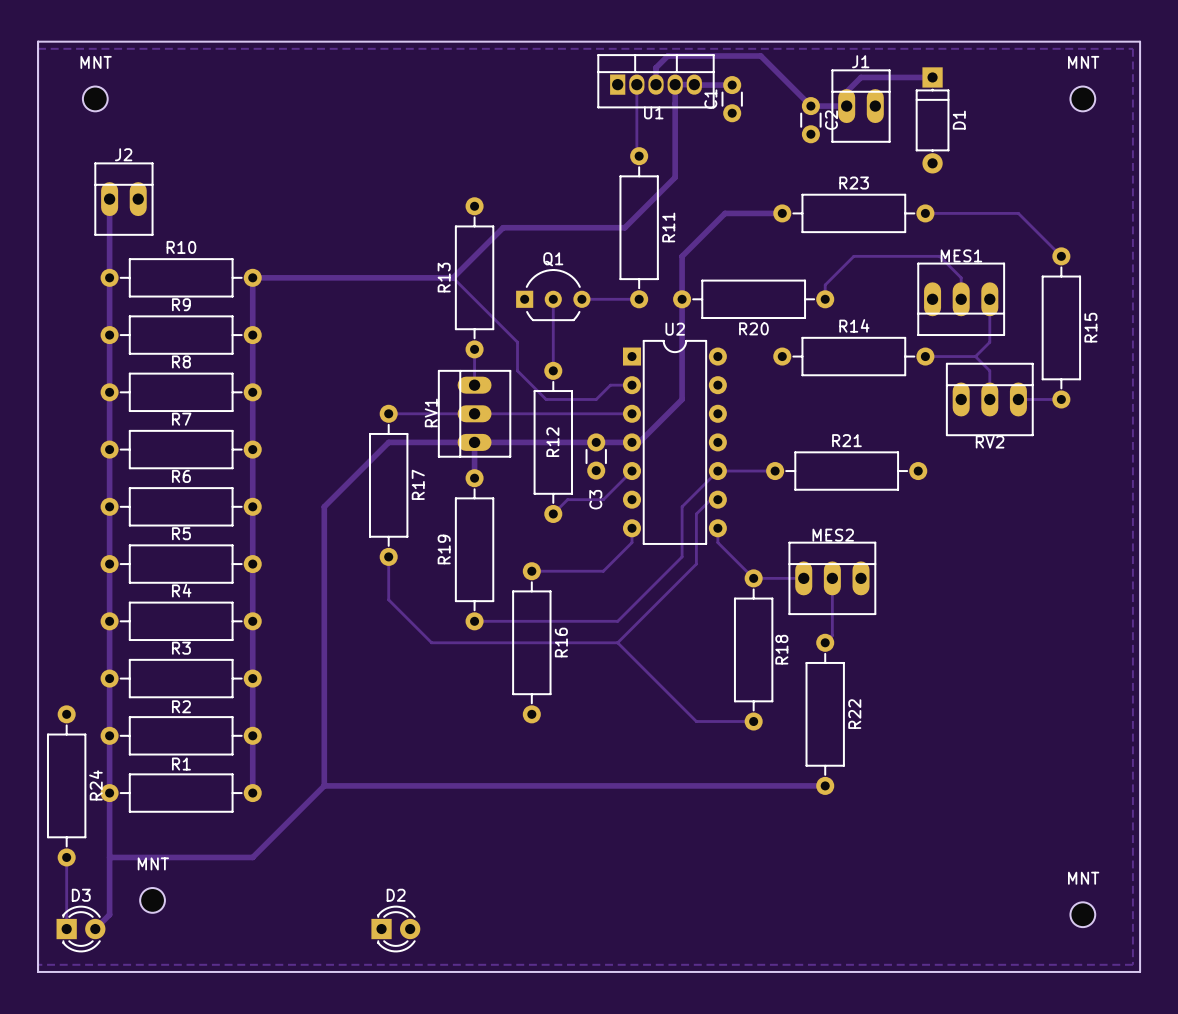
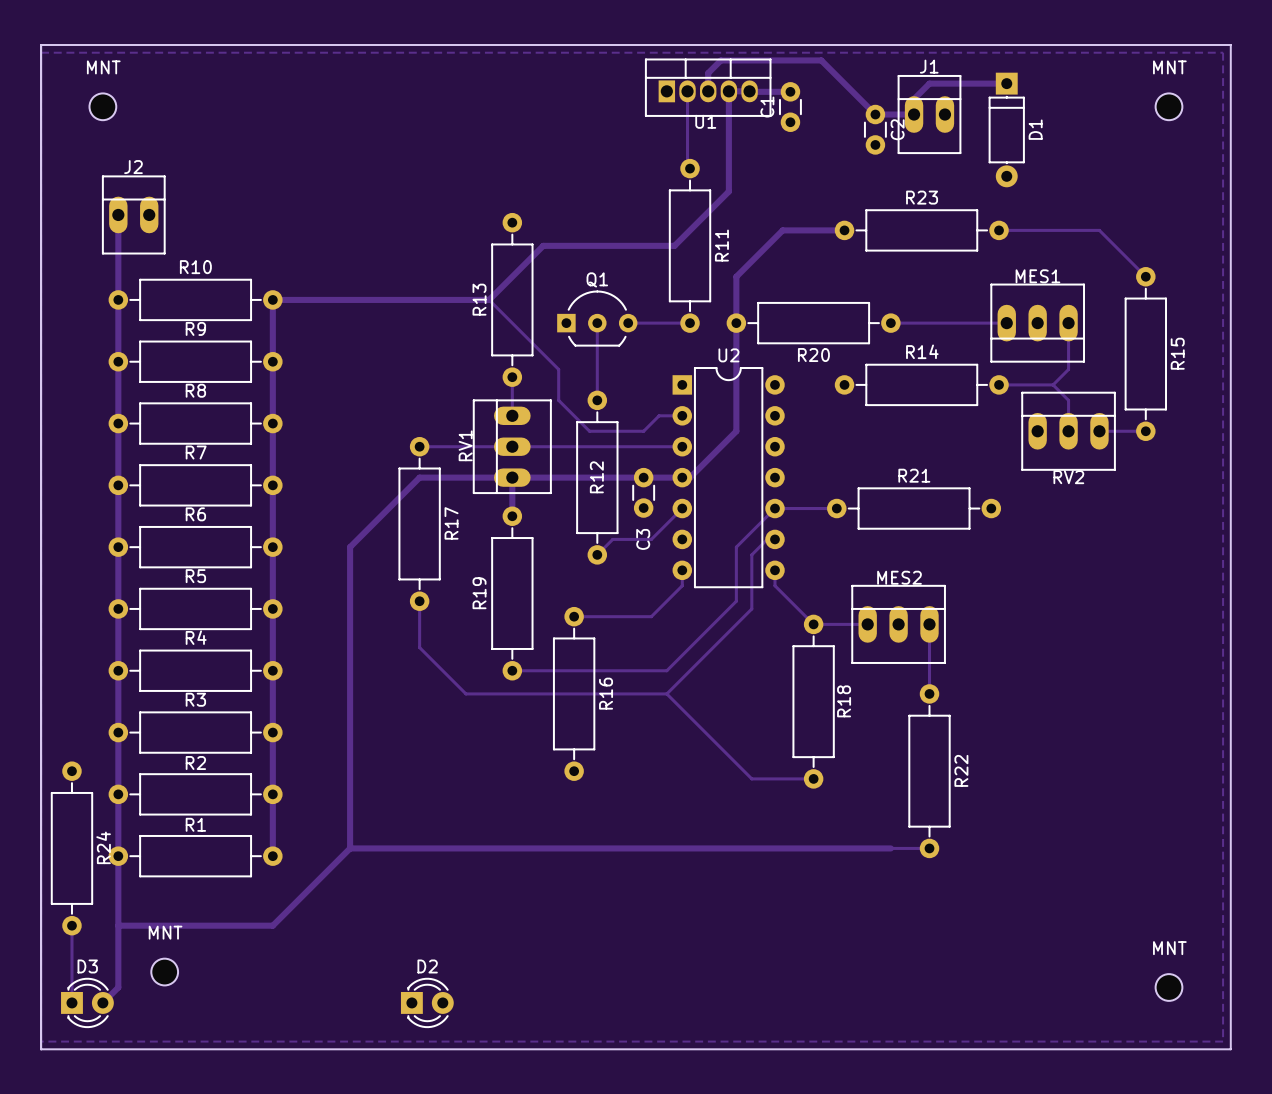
track: (825, 299) (825, 284) (853, 256) (939, 256) (961, 277) (961, 299) -> (890, 323) (1006, 323)
track: (832, 578) (832, 635) (825, 642) -> none
track: none -> (929, 624) (929, 693)
R22 position: (825, 714) -> (929, 771)
track: none -> (890, 848) (929, 848)

